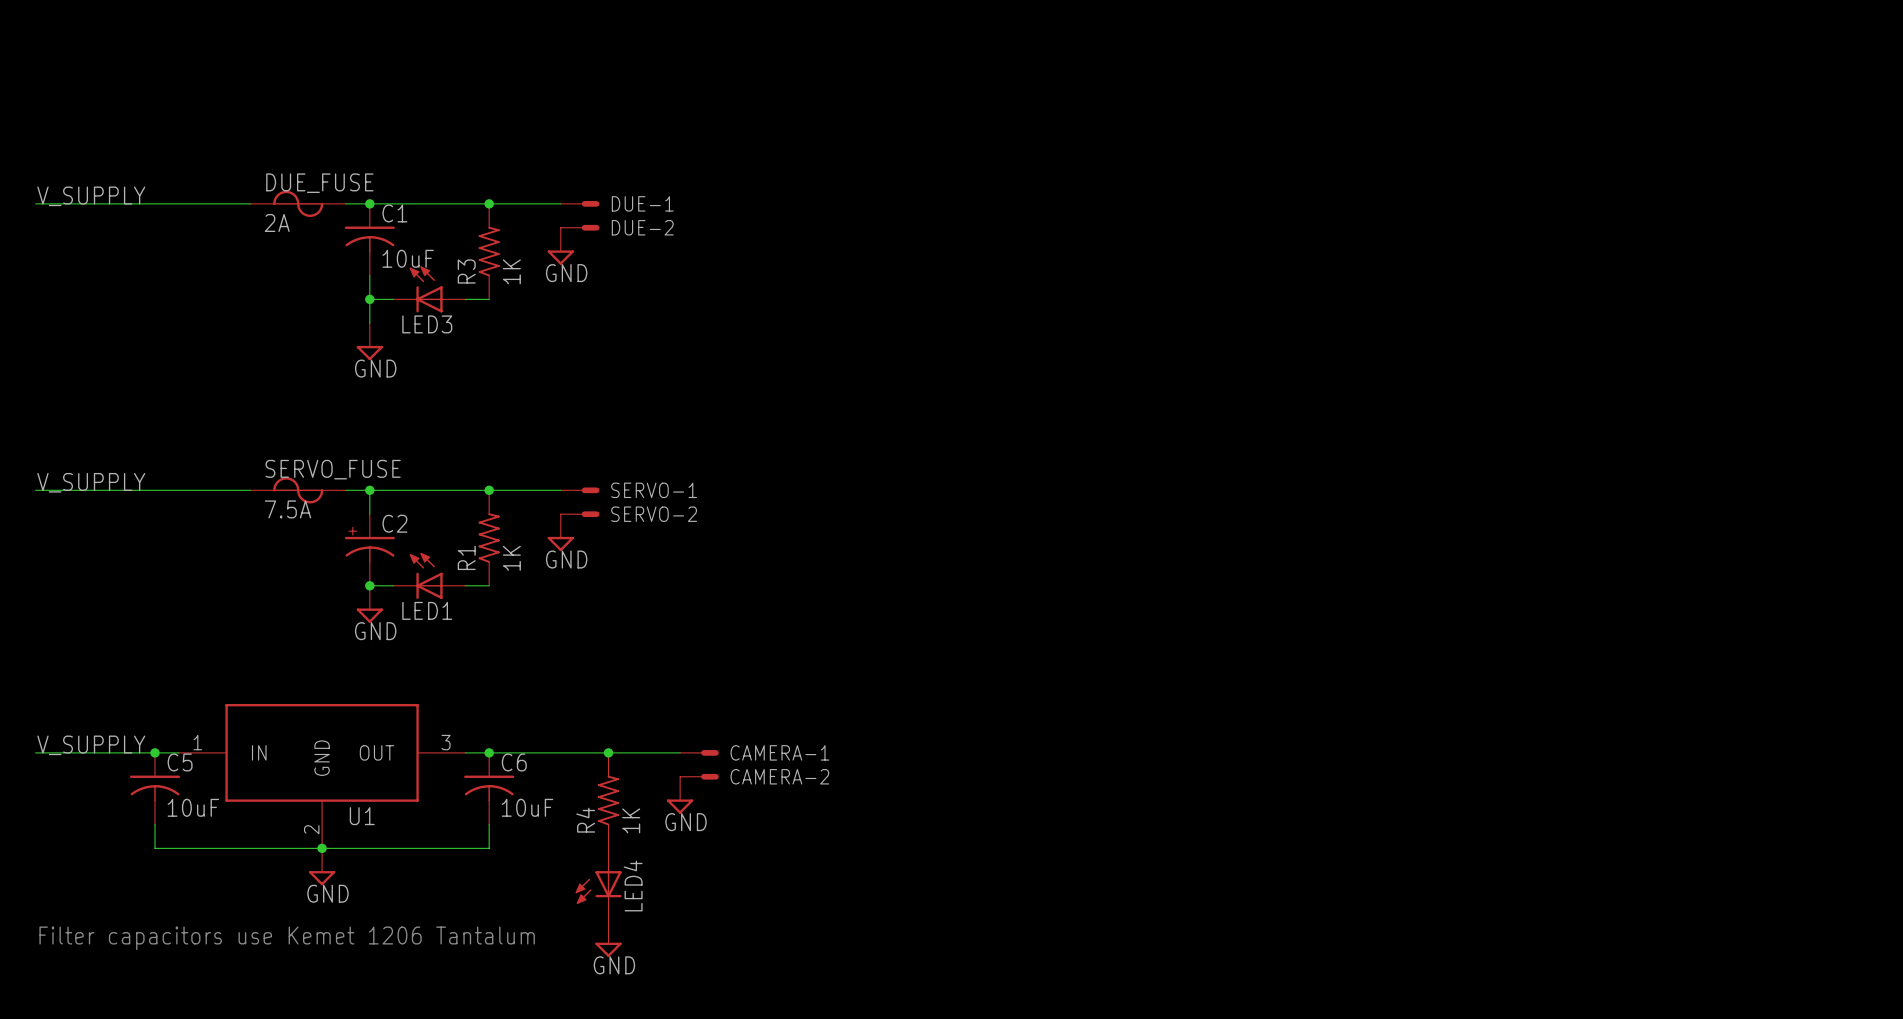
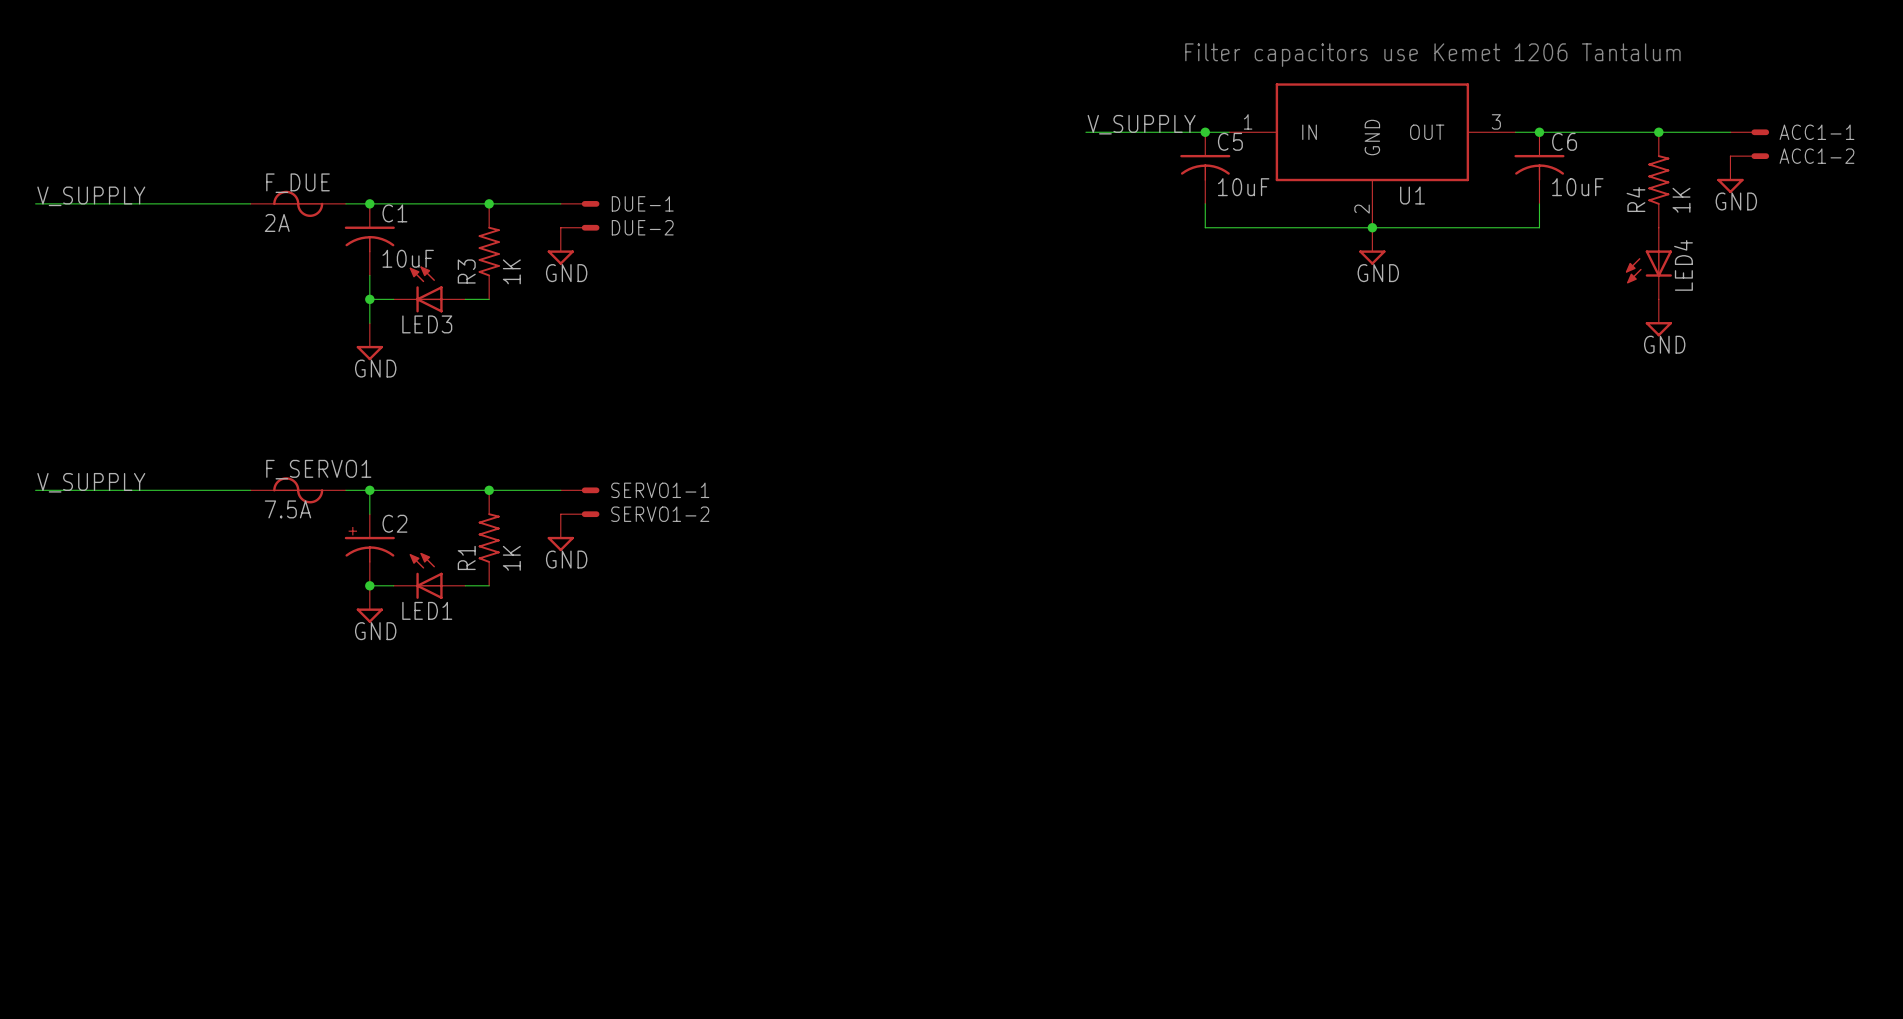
text: none -> Filter capacitors use Kemet 1206 Tantalum (1432, 55)
label: none -> V_SUPPLY (1141, 124)
wire: none -> (1085, 132) (1229, 132)
junction: none -> (1205, 132)
wire: none -> (1515, 132) (1730, 132)
junction: none -> (1539, 132)
junction: none -> (1658, 132)
ACC1-1: none -> (1749, 132)
ACC1-2: none -> (1749, 156)
power symbol: none -> GND (1730, 174)
DUE_FUSE name: DUE_FUSE (319, 183) -> F_DUE (298, 183)
wire: none -> (1205, 203) (1205, 227) (1539, 227) (1539, 203)
junction: none -> (1372, 227)
power symbol: none -> GND (1372, 246)
power symbol: none -> GND (1658, 317)
SERVO_FUSE name: SERVO_FUSE (333, 469) -> F_SERVO1 (318, 469)
SERVO-1 name: SERVO-1 (654, 490) -> SERVO1-1 (660, 490)
SERVO-2 name: SERVO-2 (654, 514) -> SERVO1-2 (660, 514)
label: V_SUPPLY (91, 745) -> none
wire: (35, 752) (178, 752) -> none
junction: (154, 752) -> none
wire: (465, 752) (680, 752) -> none
junction: (489, 752) -> none
junction: (608, 752) -> none
CAMERA-1: (699, 752) -> none
U1 position: (322, 776) -> (1372, 155)
CAMERA-2: (699, 776) -> none
C5 position: (154, 788) -> (1205, 168)
C6 position: (489, 788) -> (1539, 168)
power symbol: GND (680, 795) -> none
R4 position: (608, 800) -> (1658, 180)
wire: (154, 824) (154, 848) (489, 848) (489, 824) -> none
junction: (322, 848) -> none
power symbol: GND (322, 866) -> none
LED4 position: (598, 884) -> (1648, 263)
text: Filter capacitors use Kemet 1206 Tantalum (287, 938) -> none
power symbol: GND (608, 938) -> none

